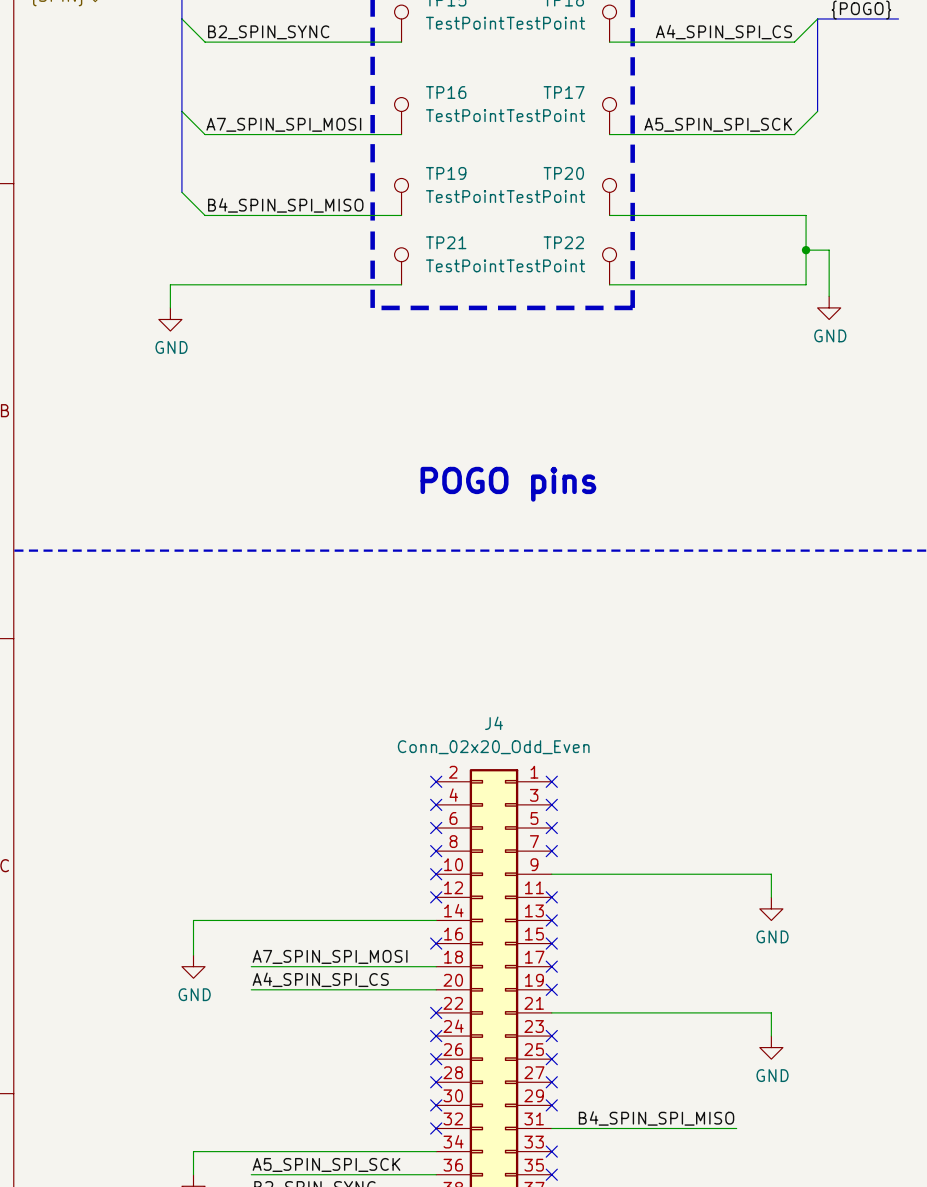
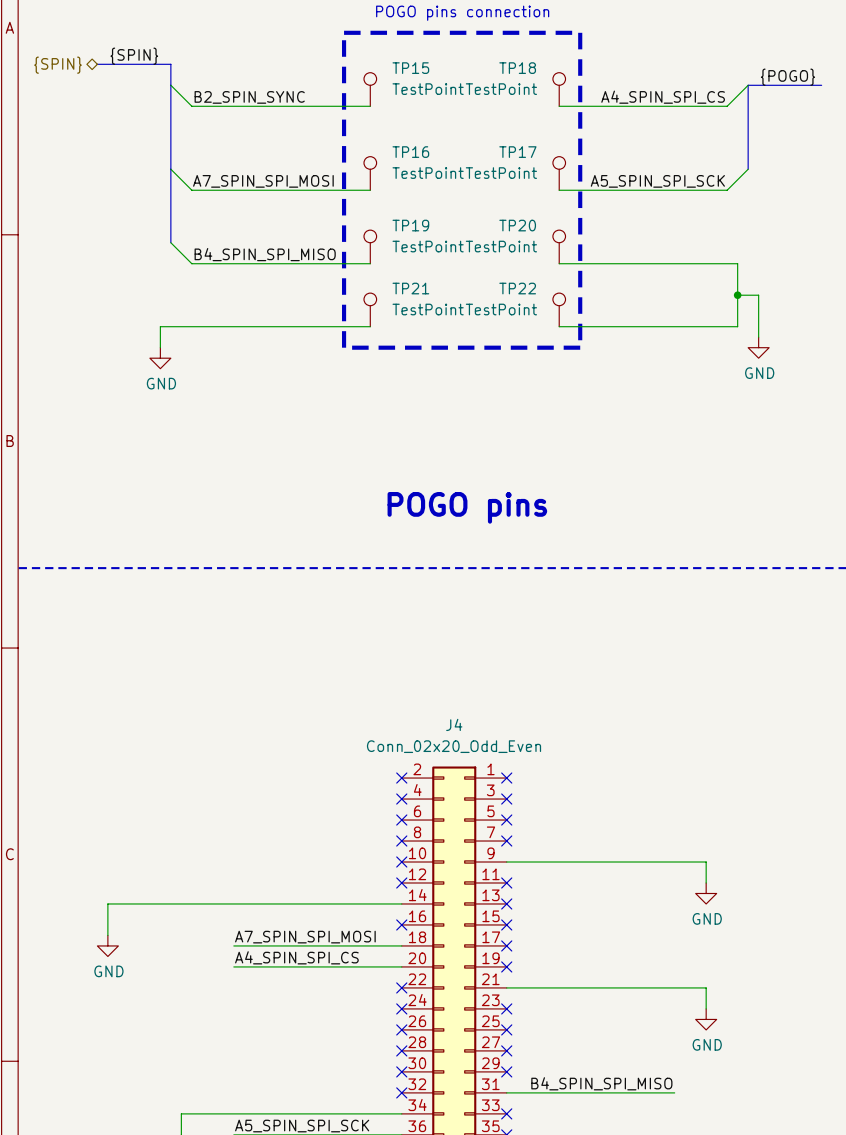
wire: (193, 920) (193, 955) -> (181, 903) (107, 903) (107, 935)
power symbol position: GND (193, 966) -> GND (107, 945)

